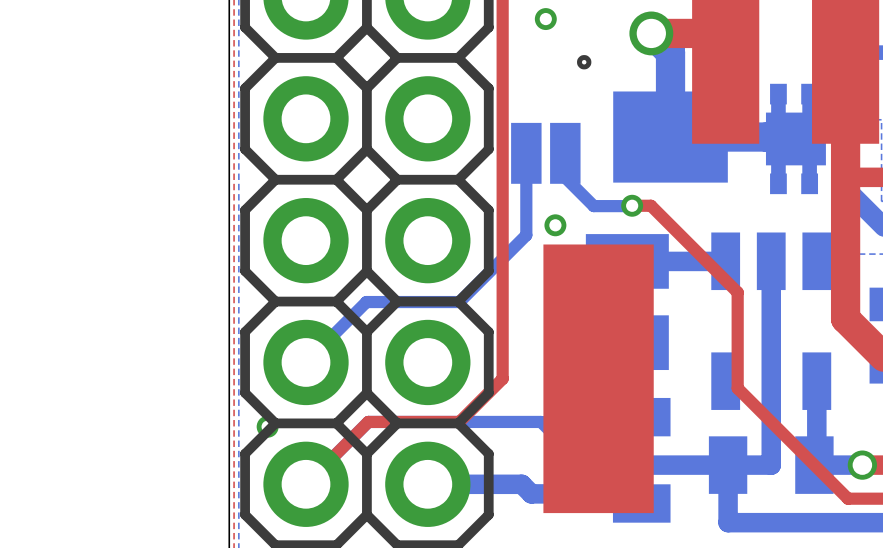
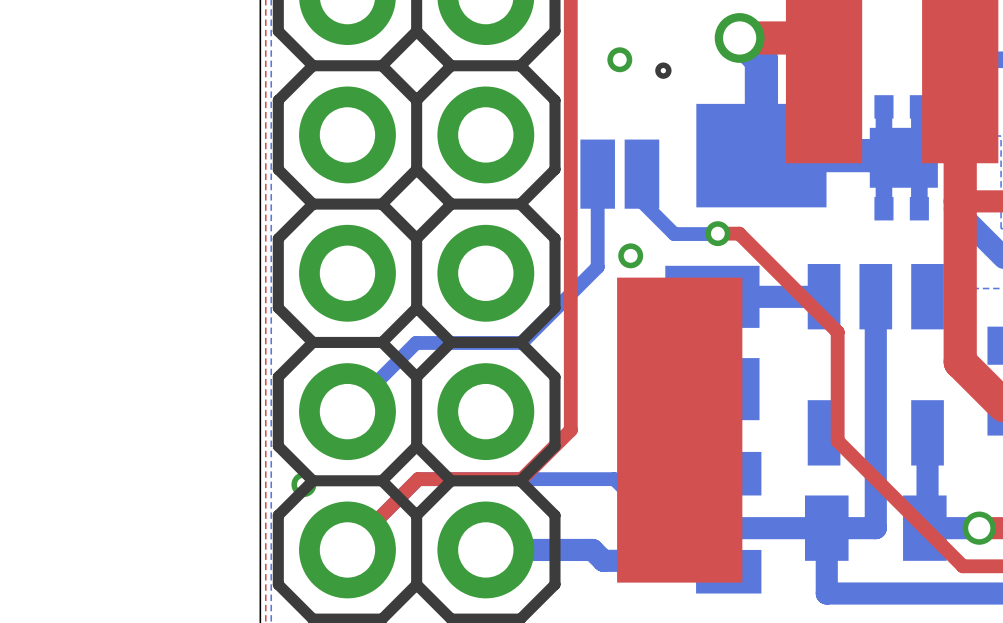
via position: (545, 19) -> (619, 59)

